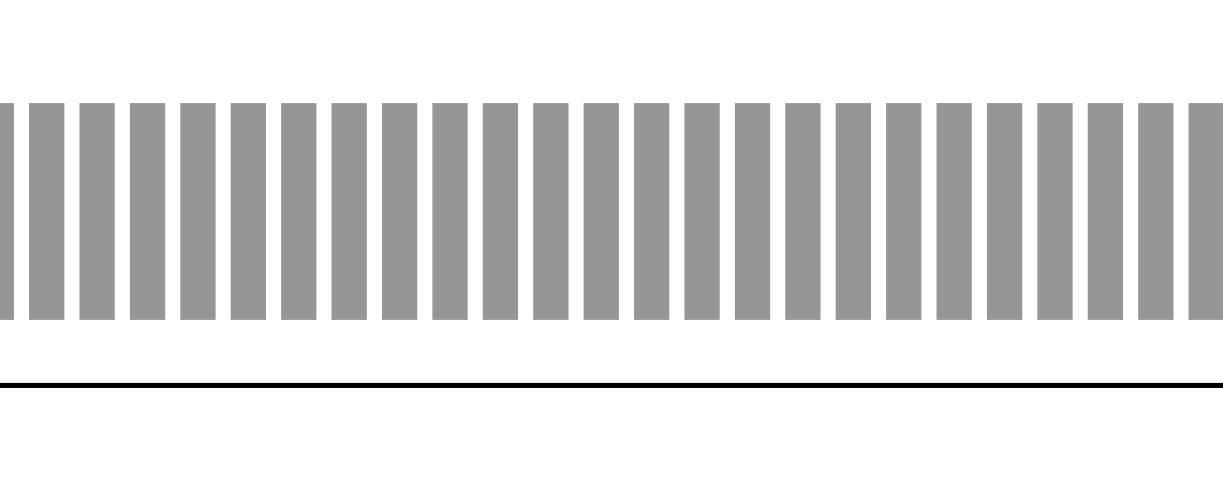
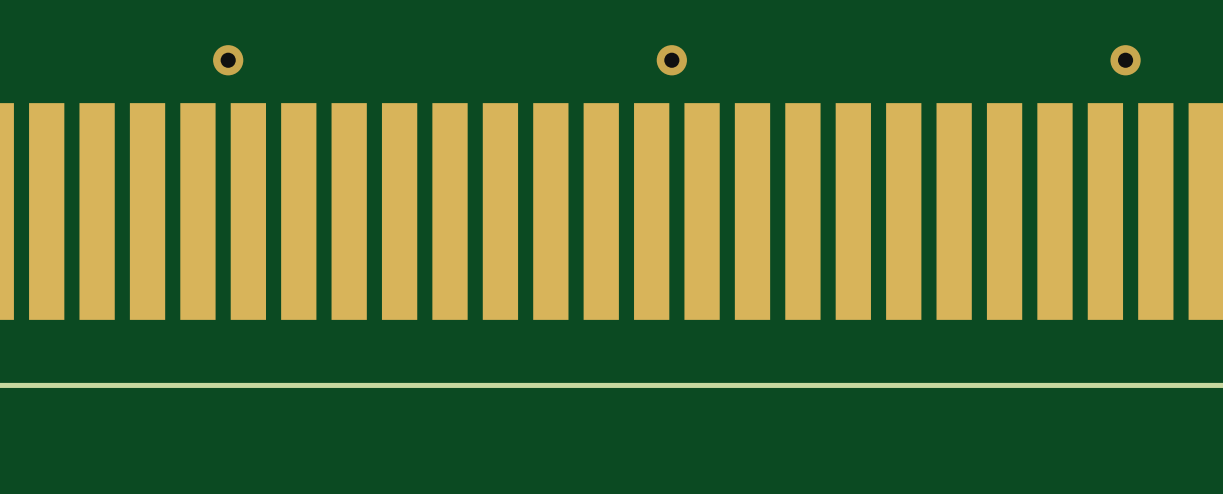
via: none -> (228, 60)
via: none -> (671, 60)
via: none -> (1125, 60)

